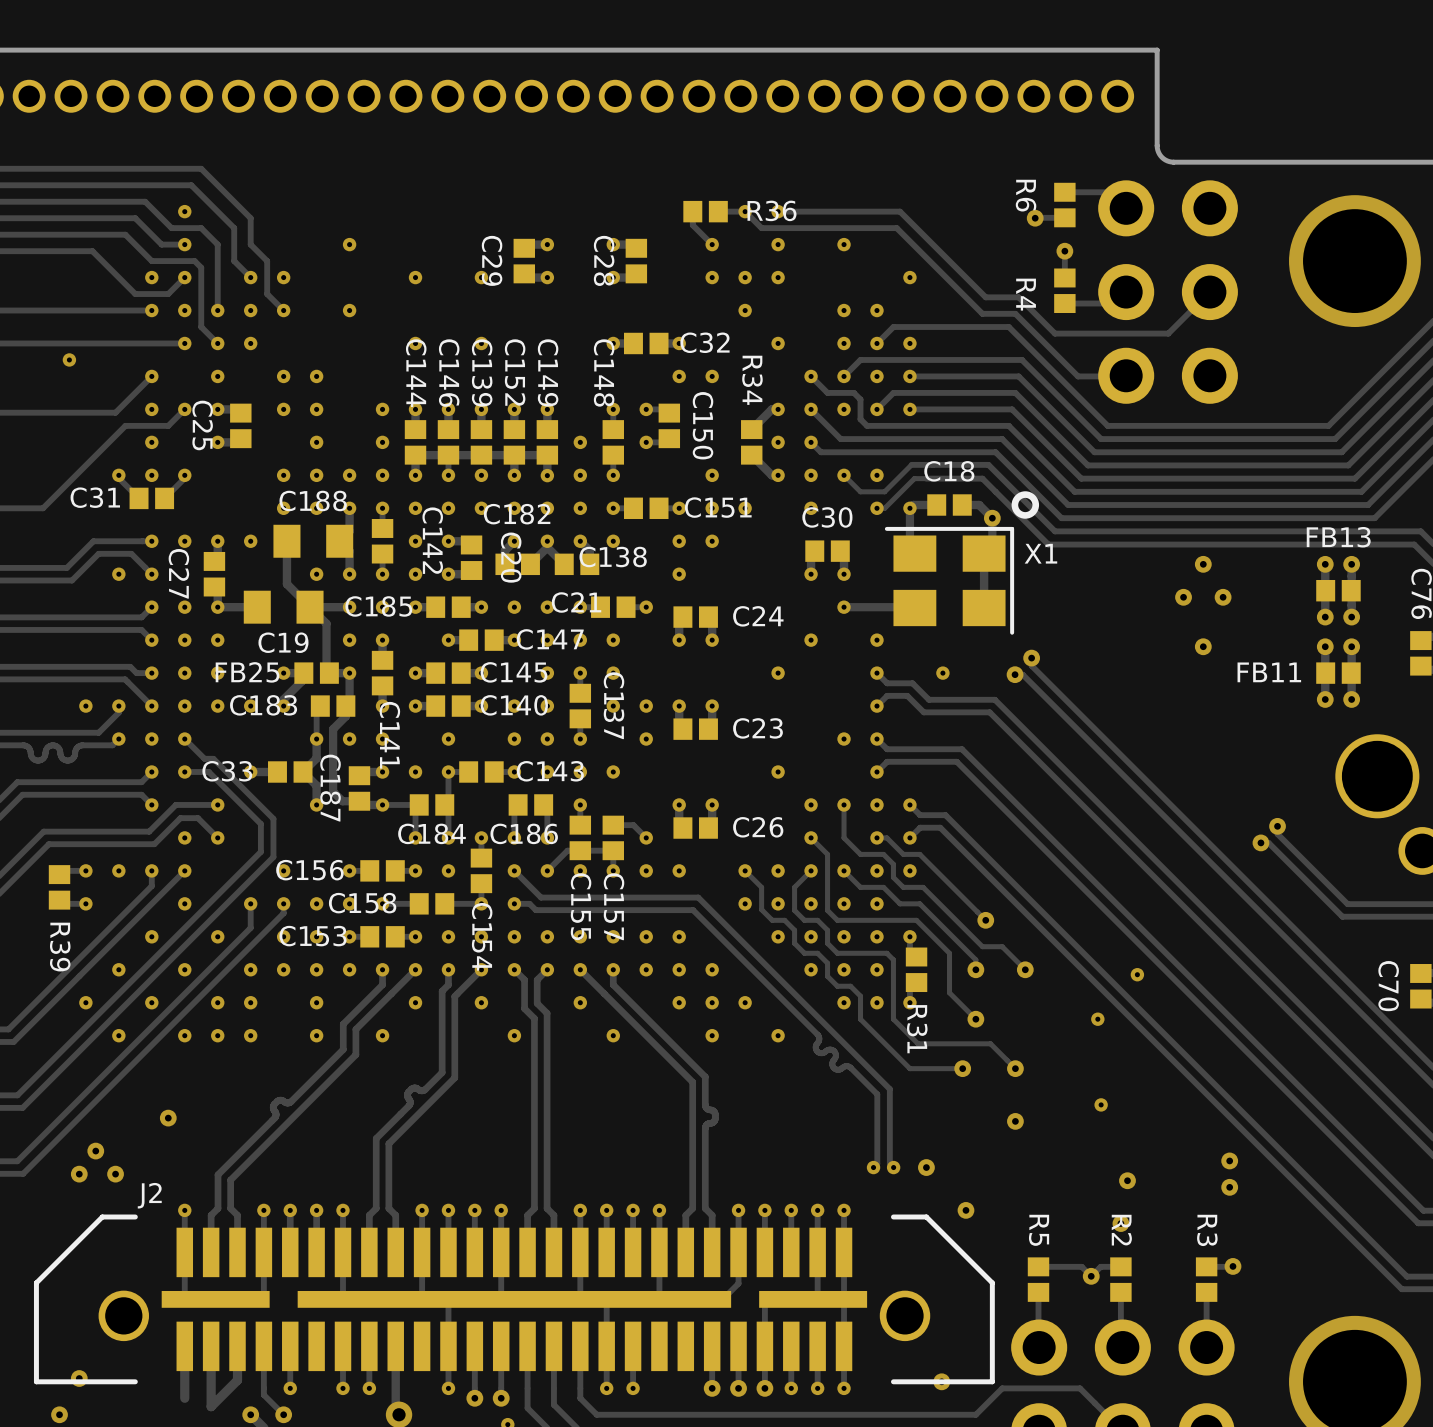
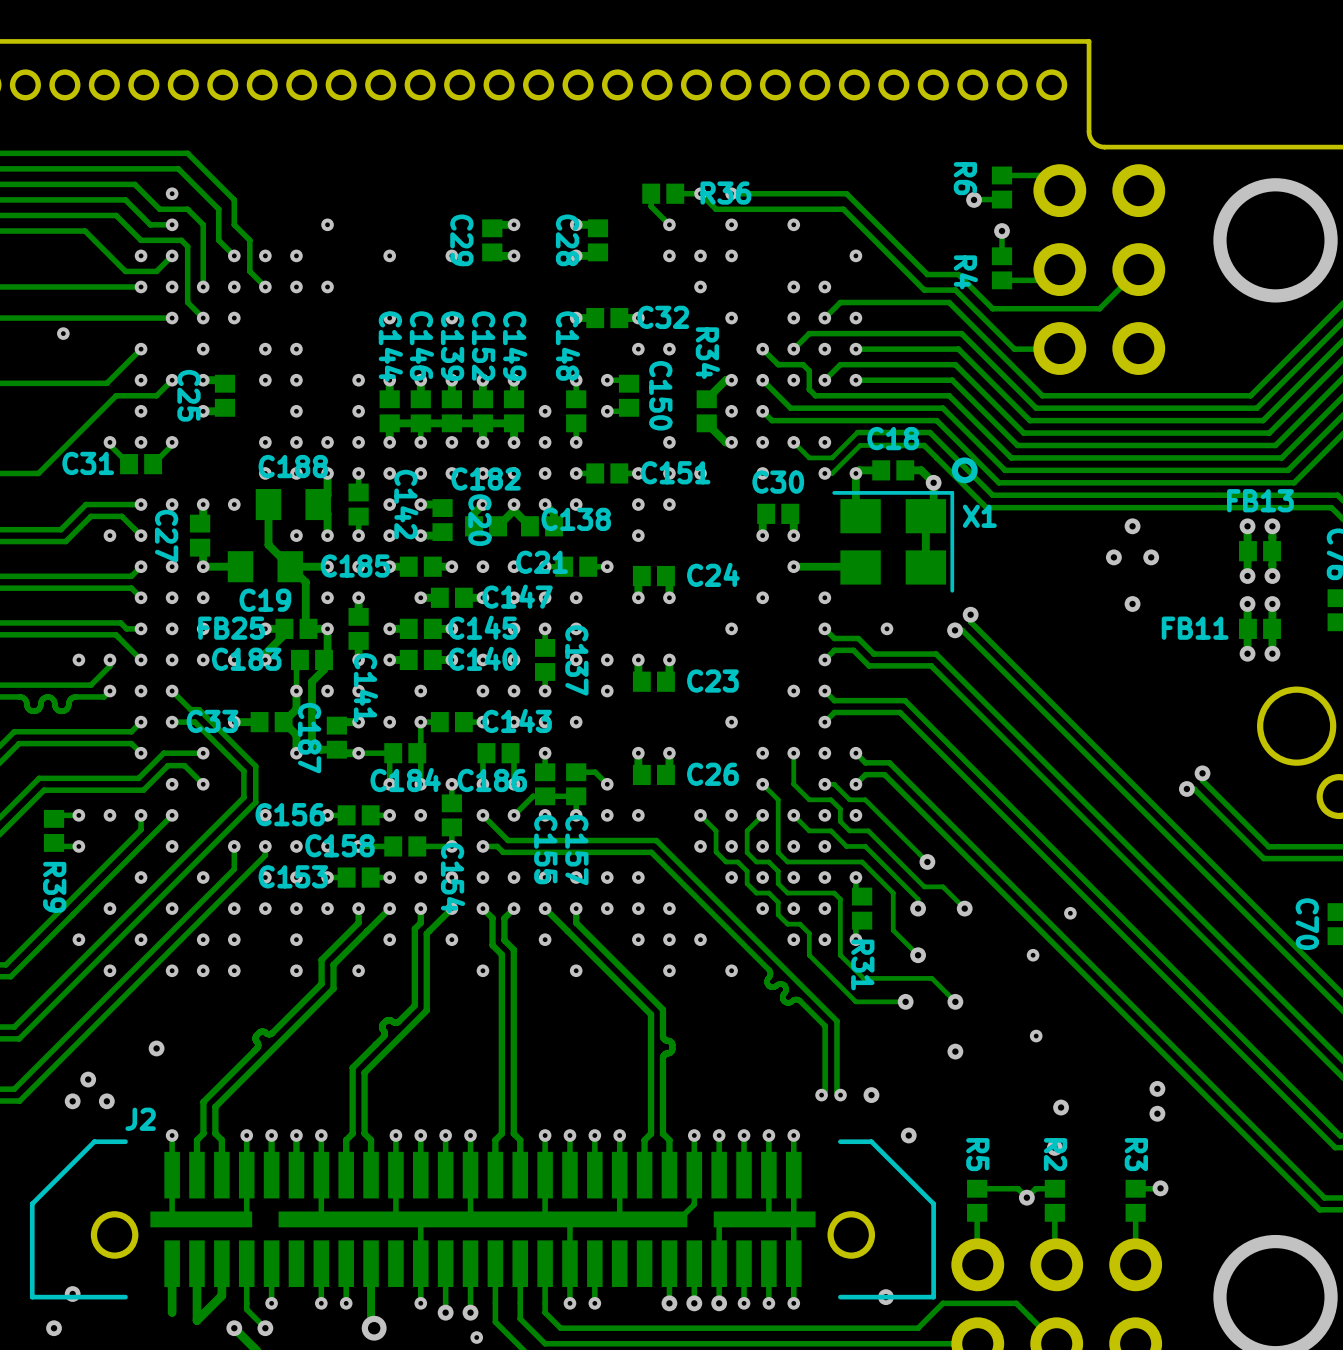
via: none -> (296, 255)
via: none -> (296, 286)

